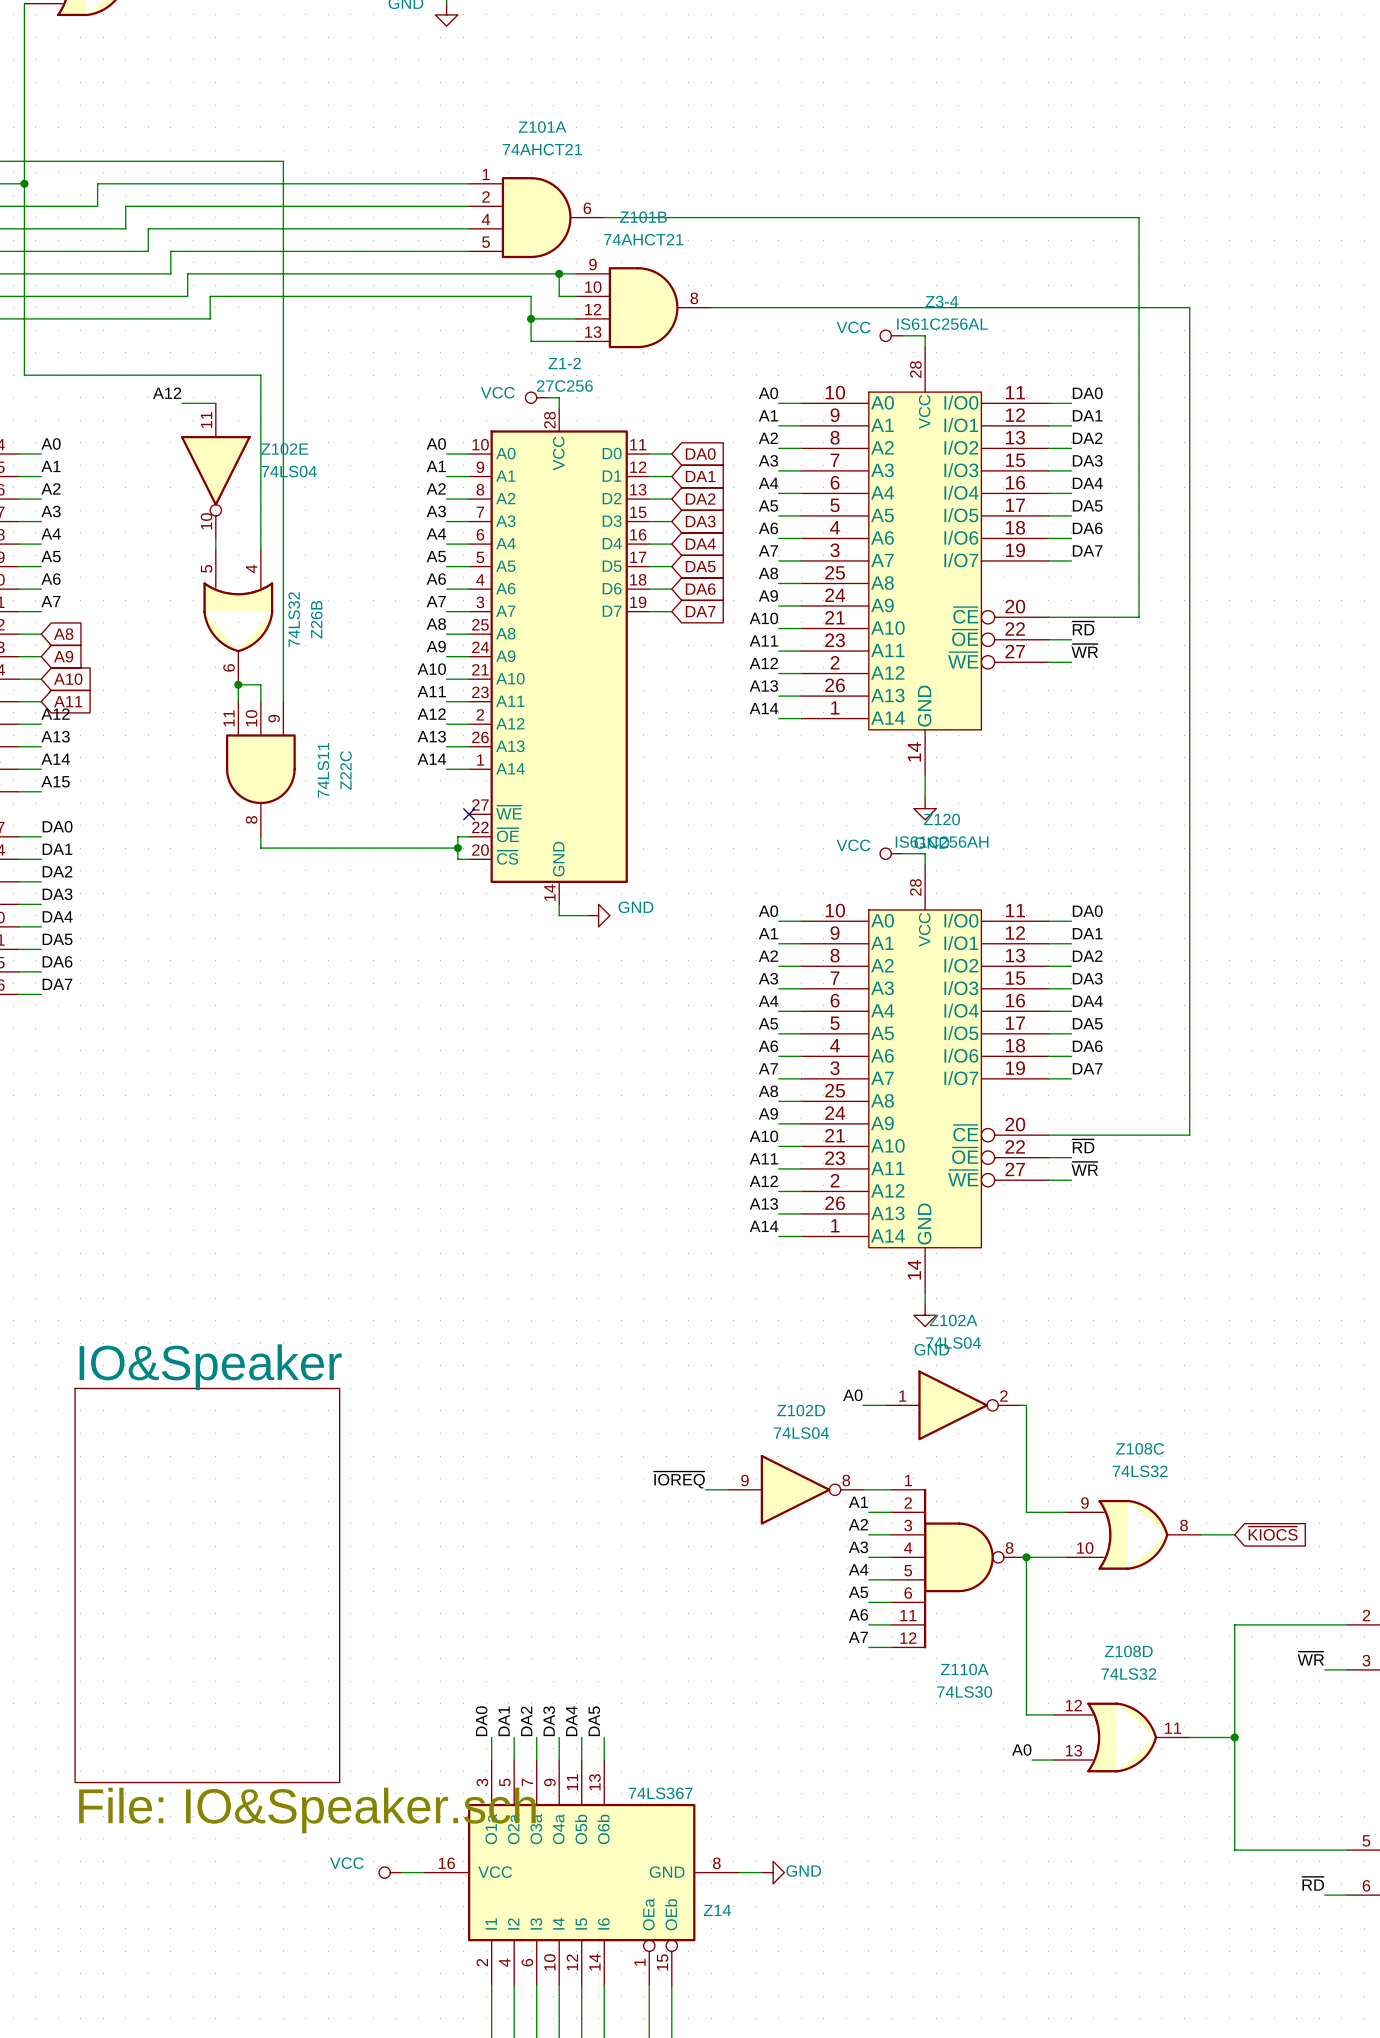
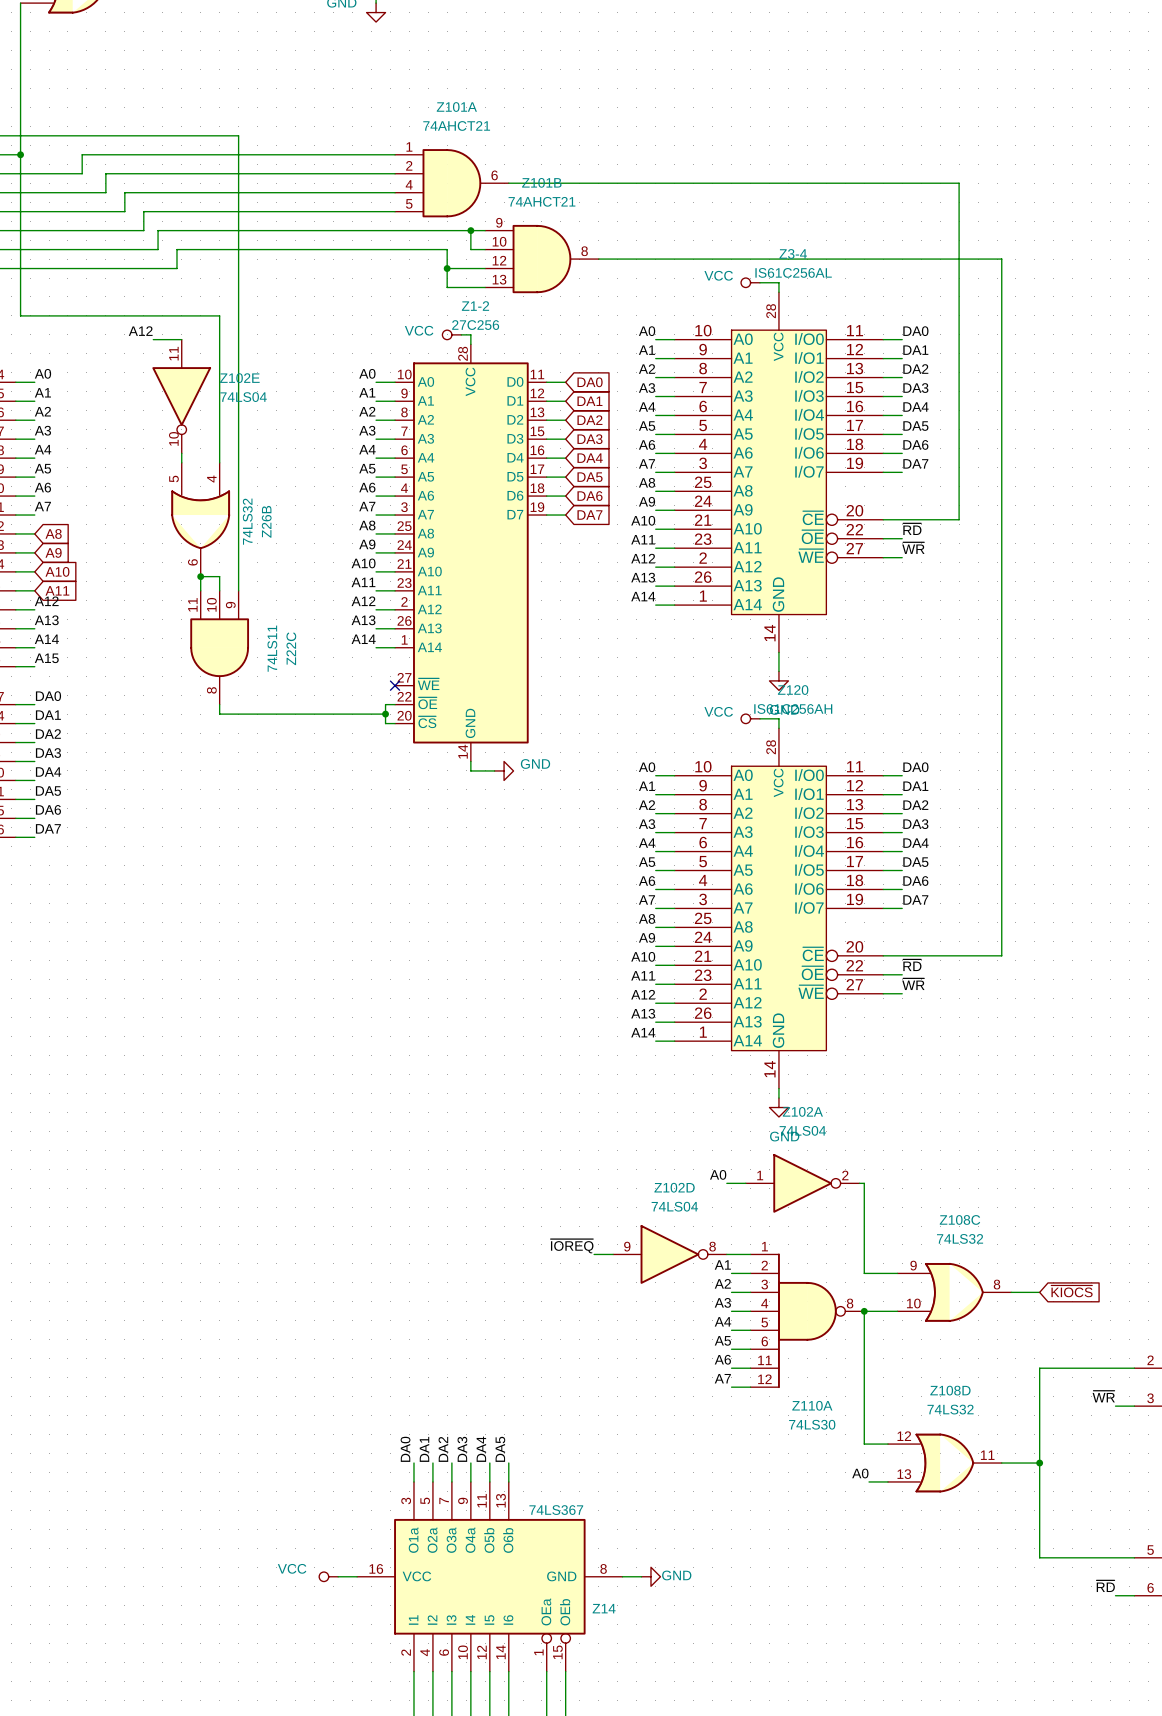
sheet IO&Speaker: File: IO&Speaker.sch (207, 1585) -> none

